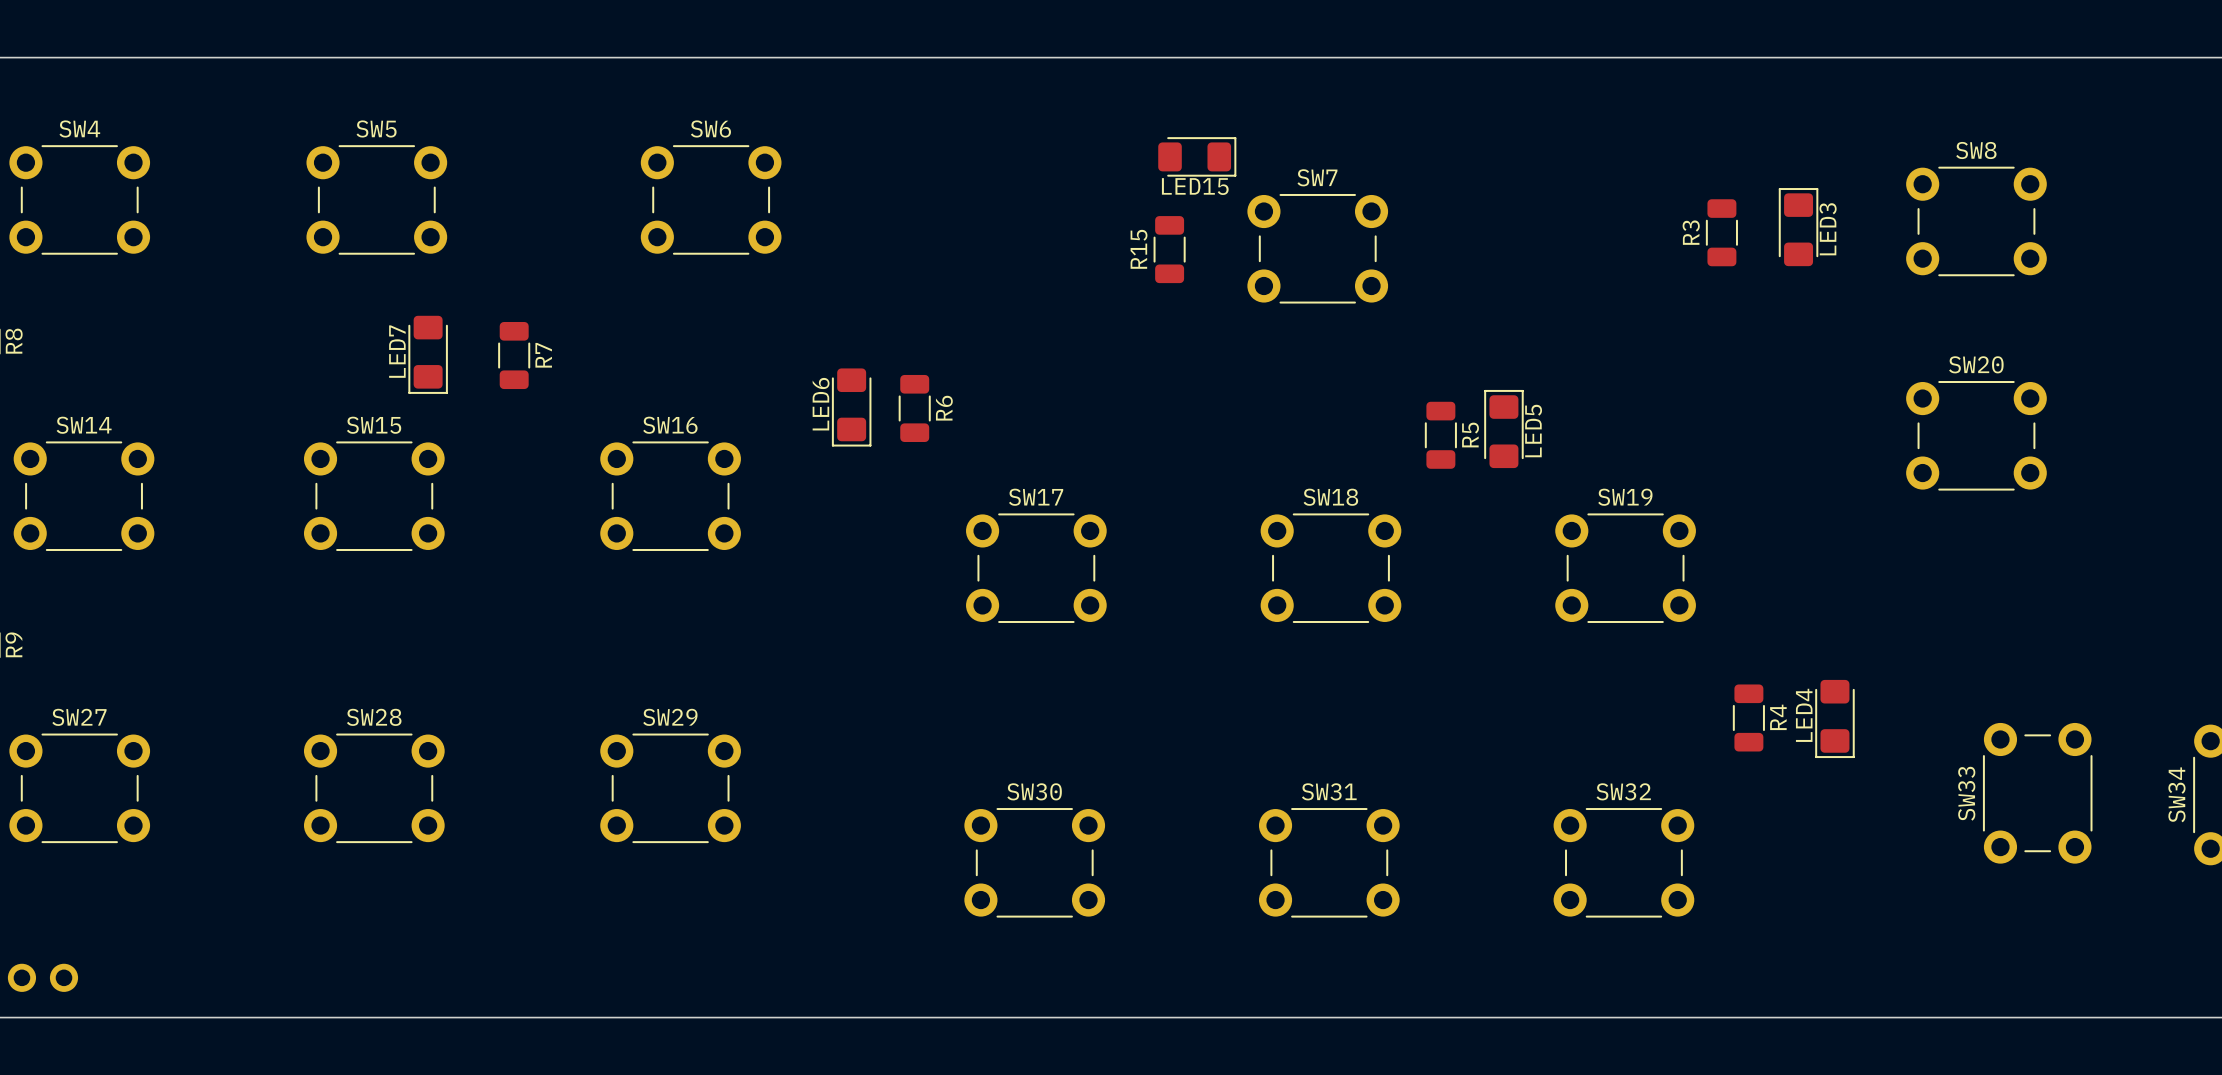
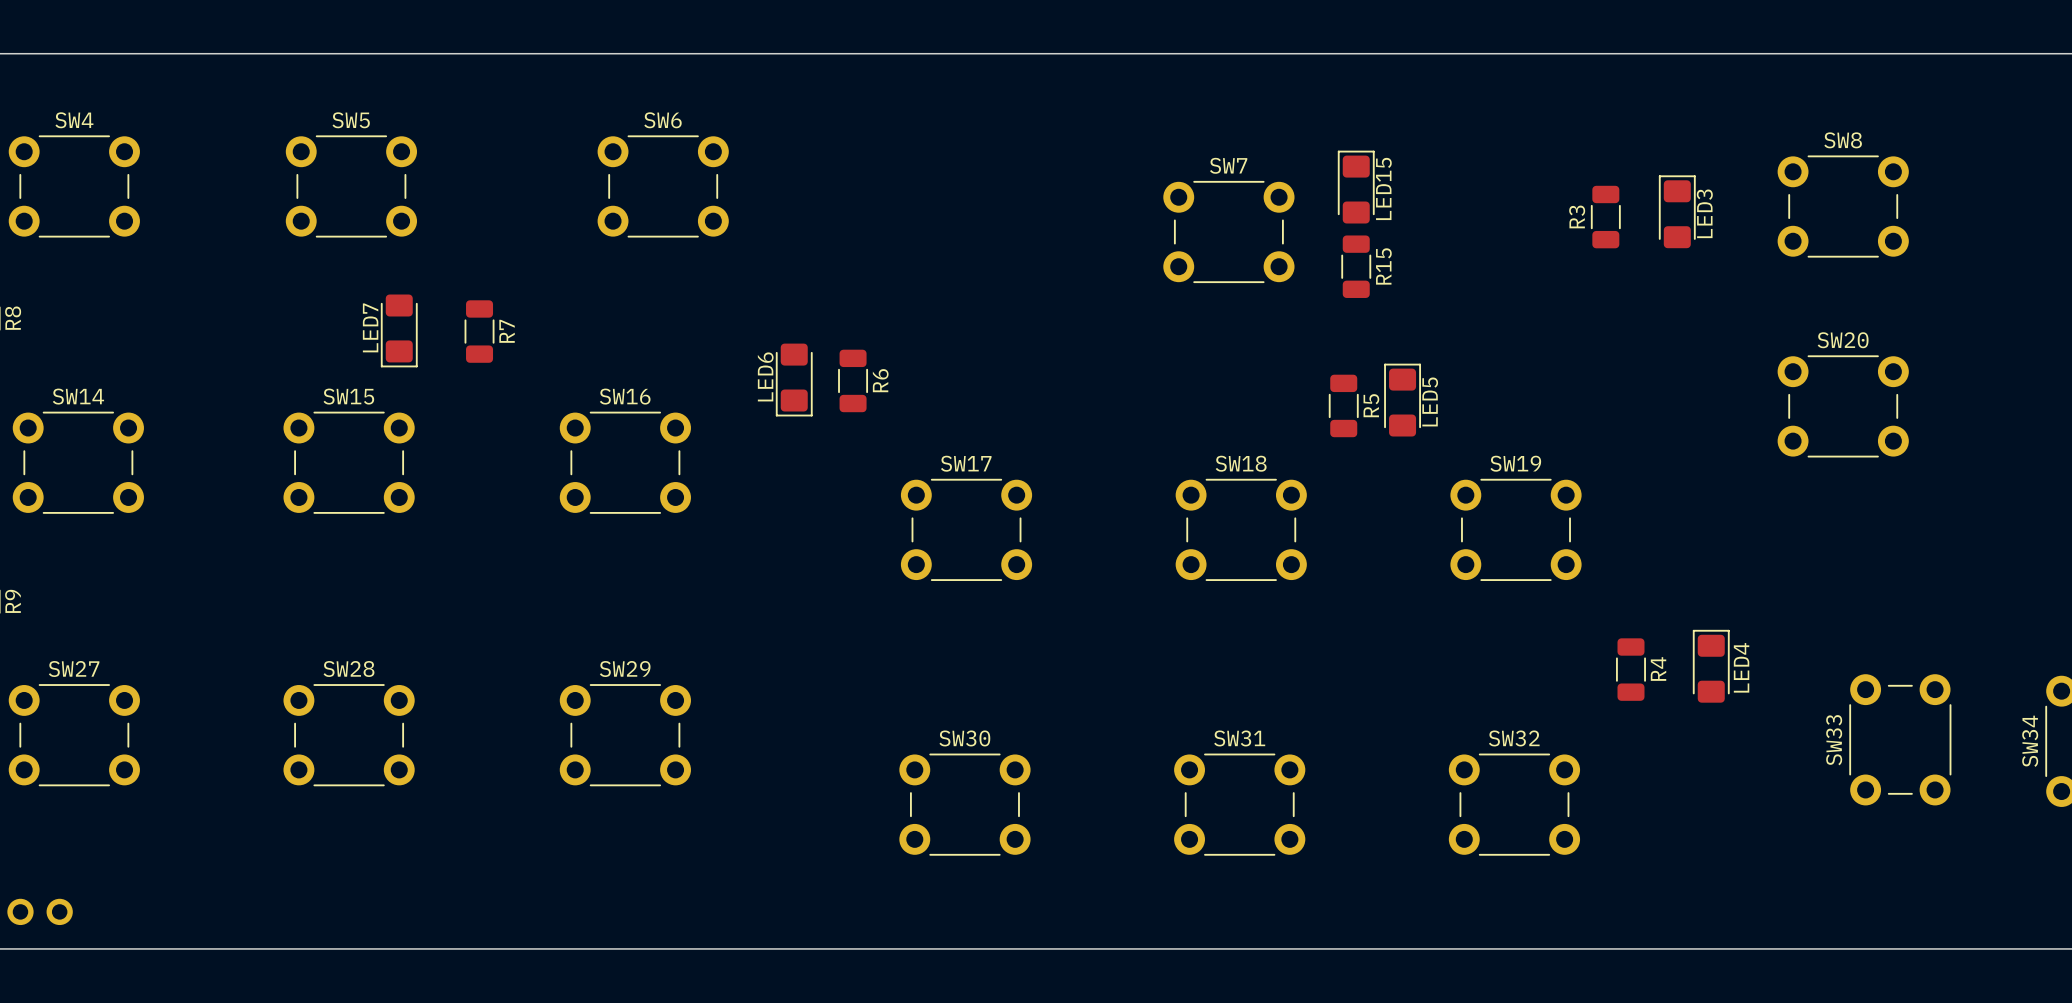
LED15 rotation: 0° (1197, 156) -> 90° counterclockwise (1356, 187)
LED15 position: (1197, 156) -> (1356, 187)
R15 name position: R15 (1139, 249) -> R15 (1383, 266)
R15 position: (1169, 249) -> (1356, 266)
LED4 rotation: 0° (1834, 718) -> 180° (1711, 666)

